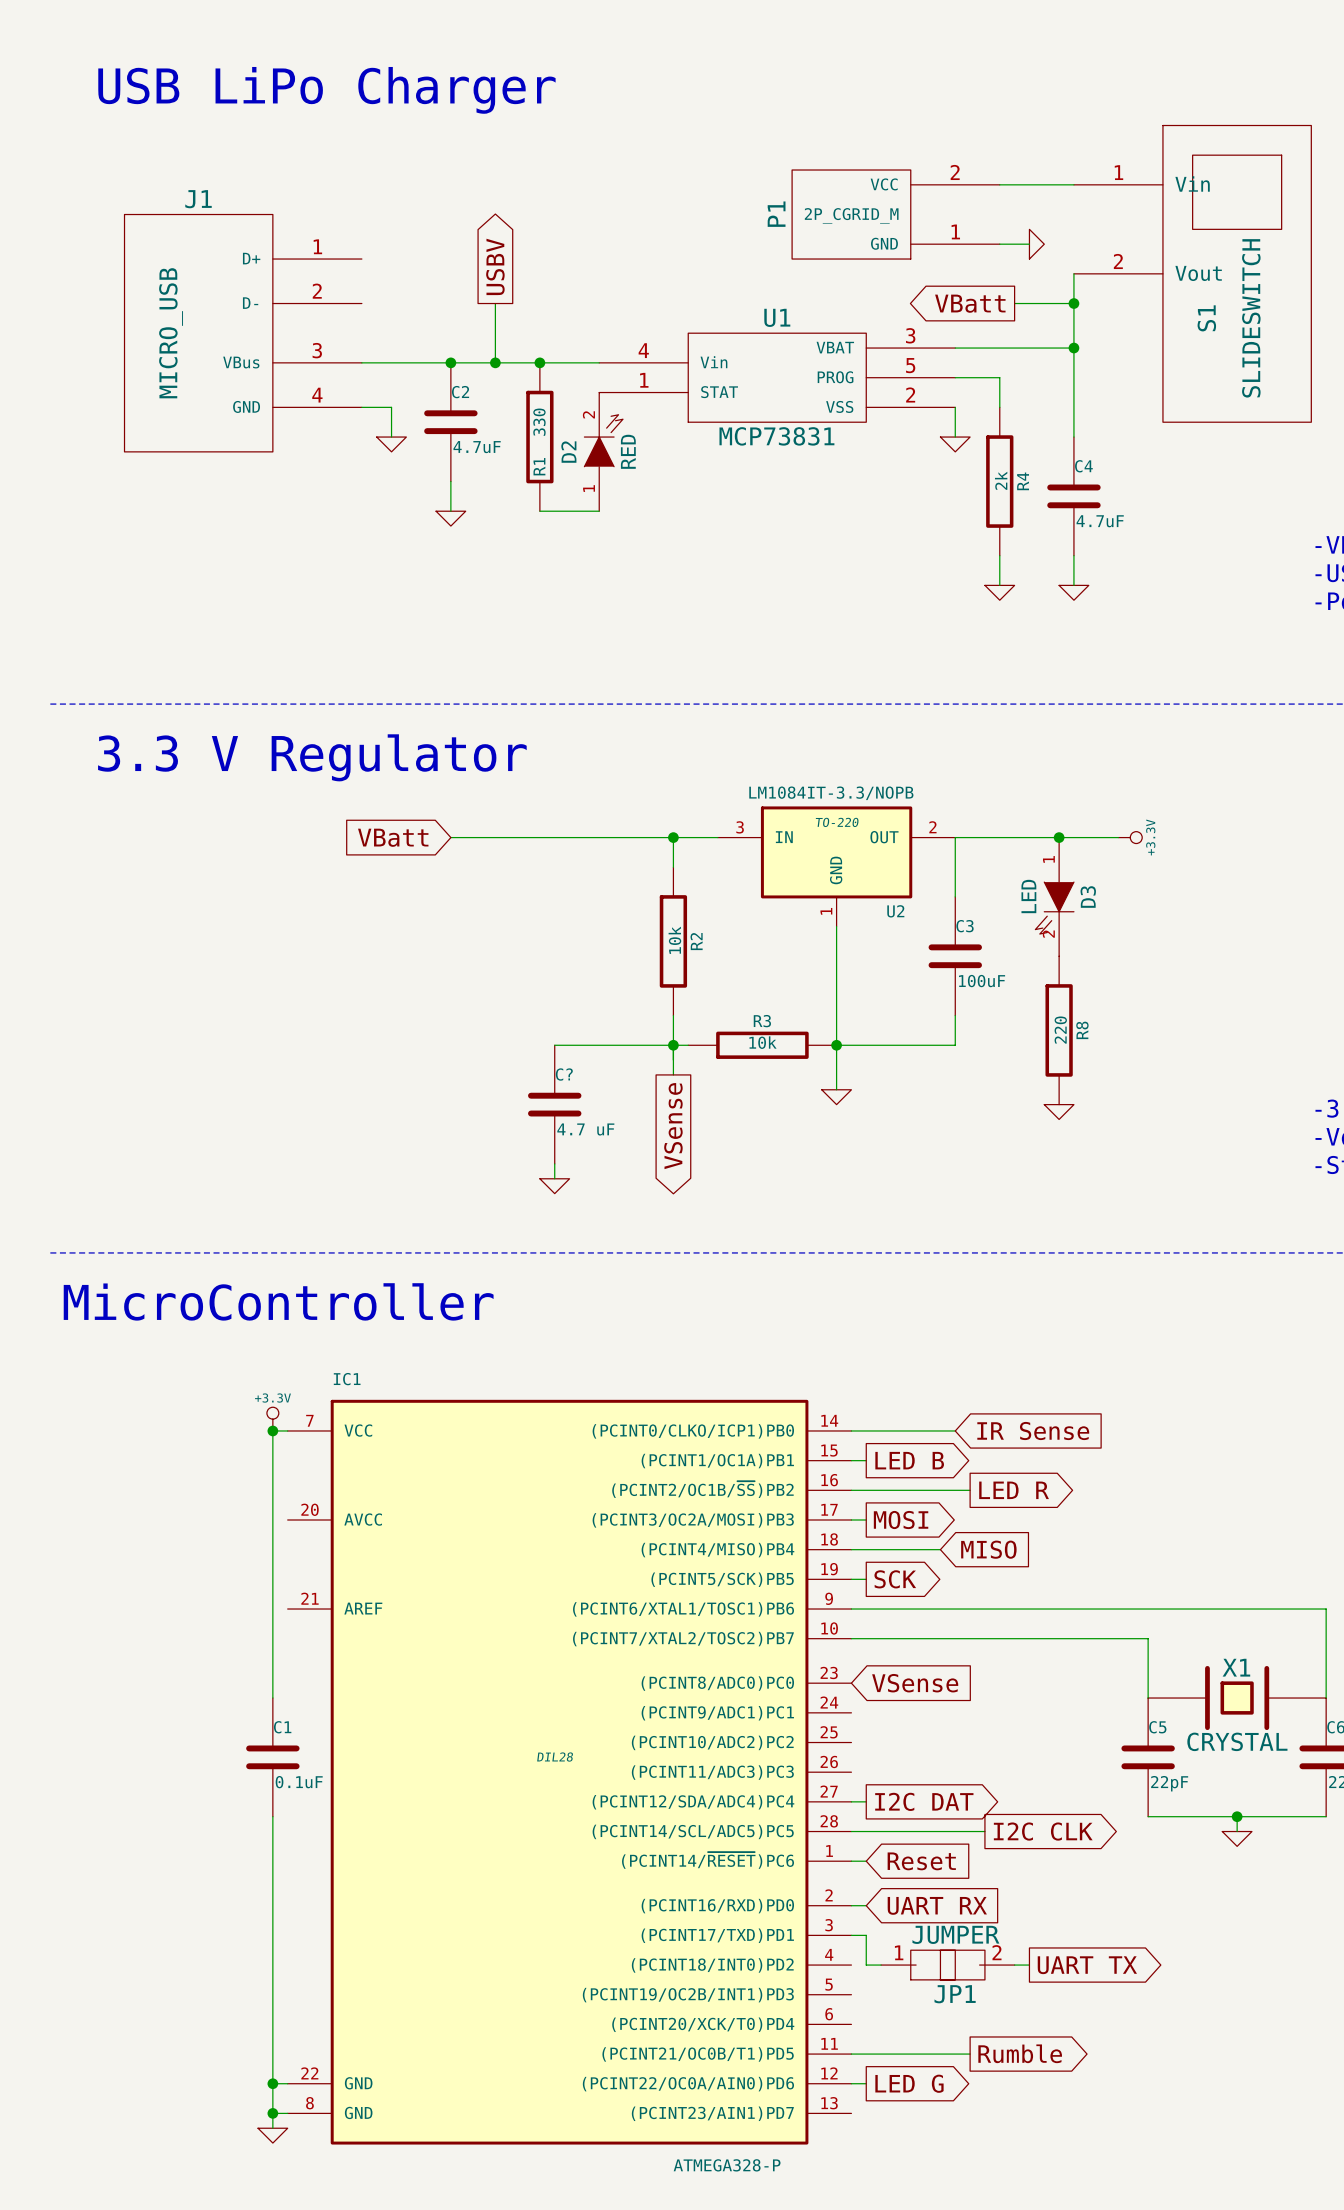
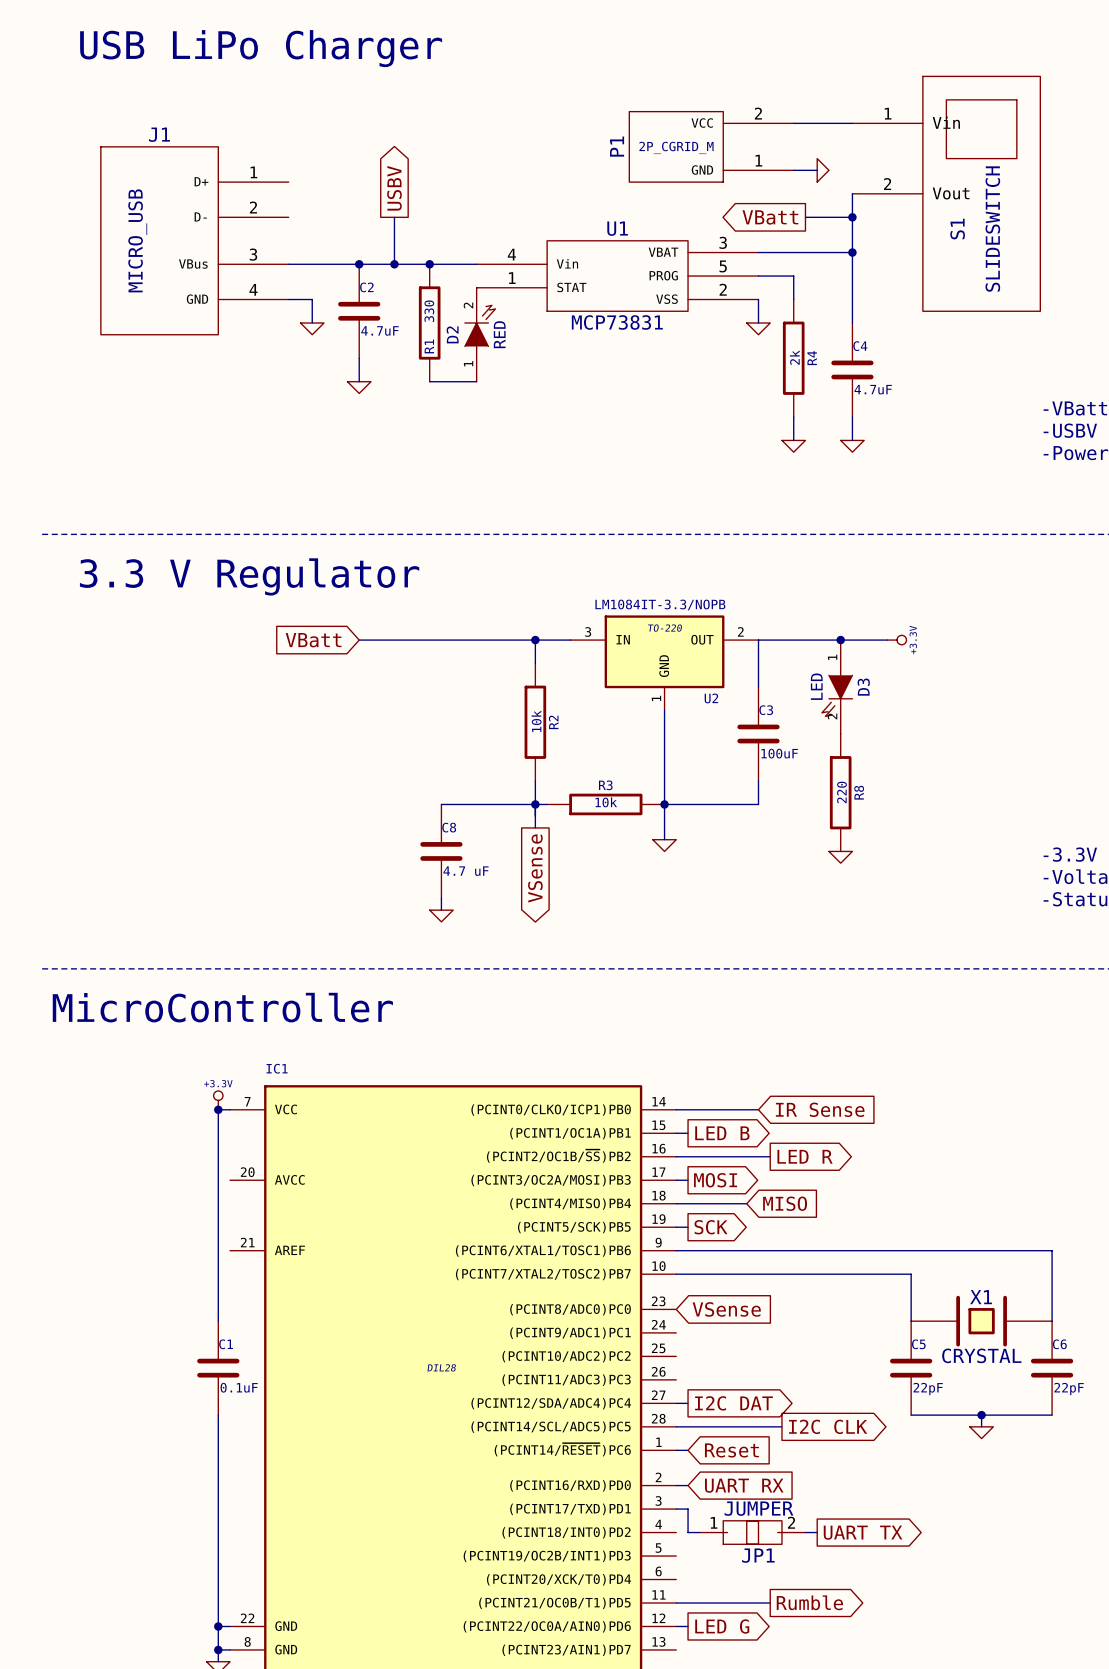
C? name: C? (564, 1074) -> C8 (449, 827)

